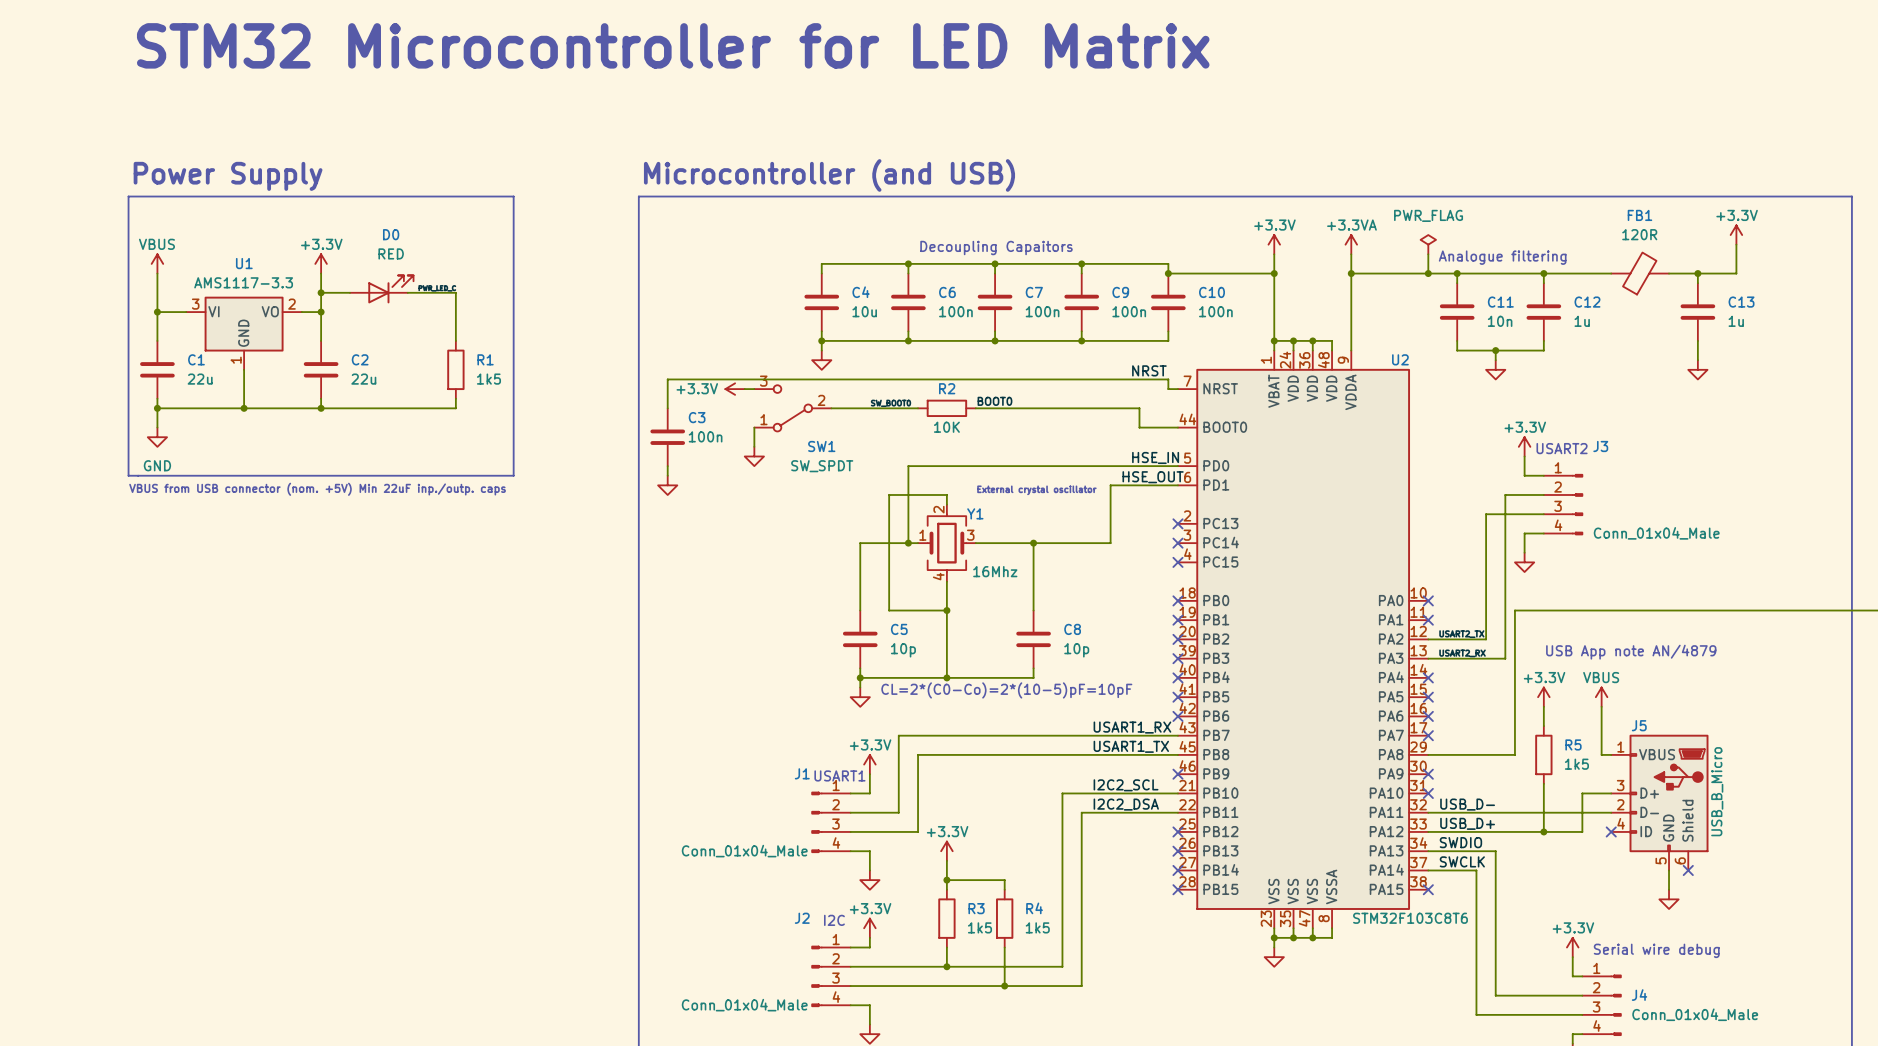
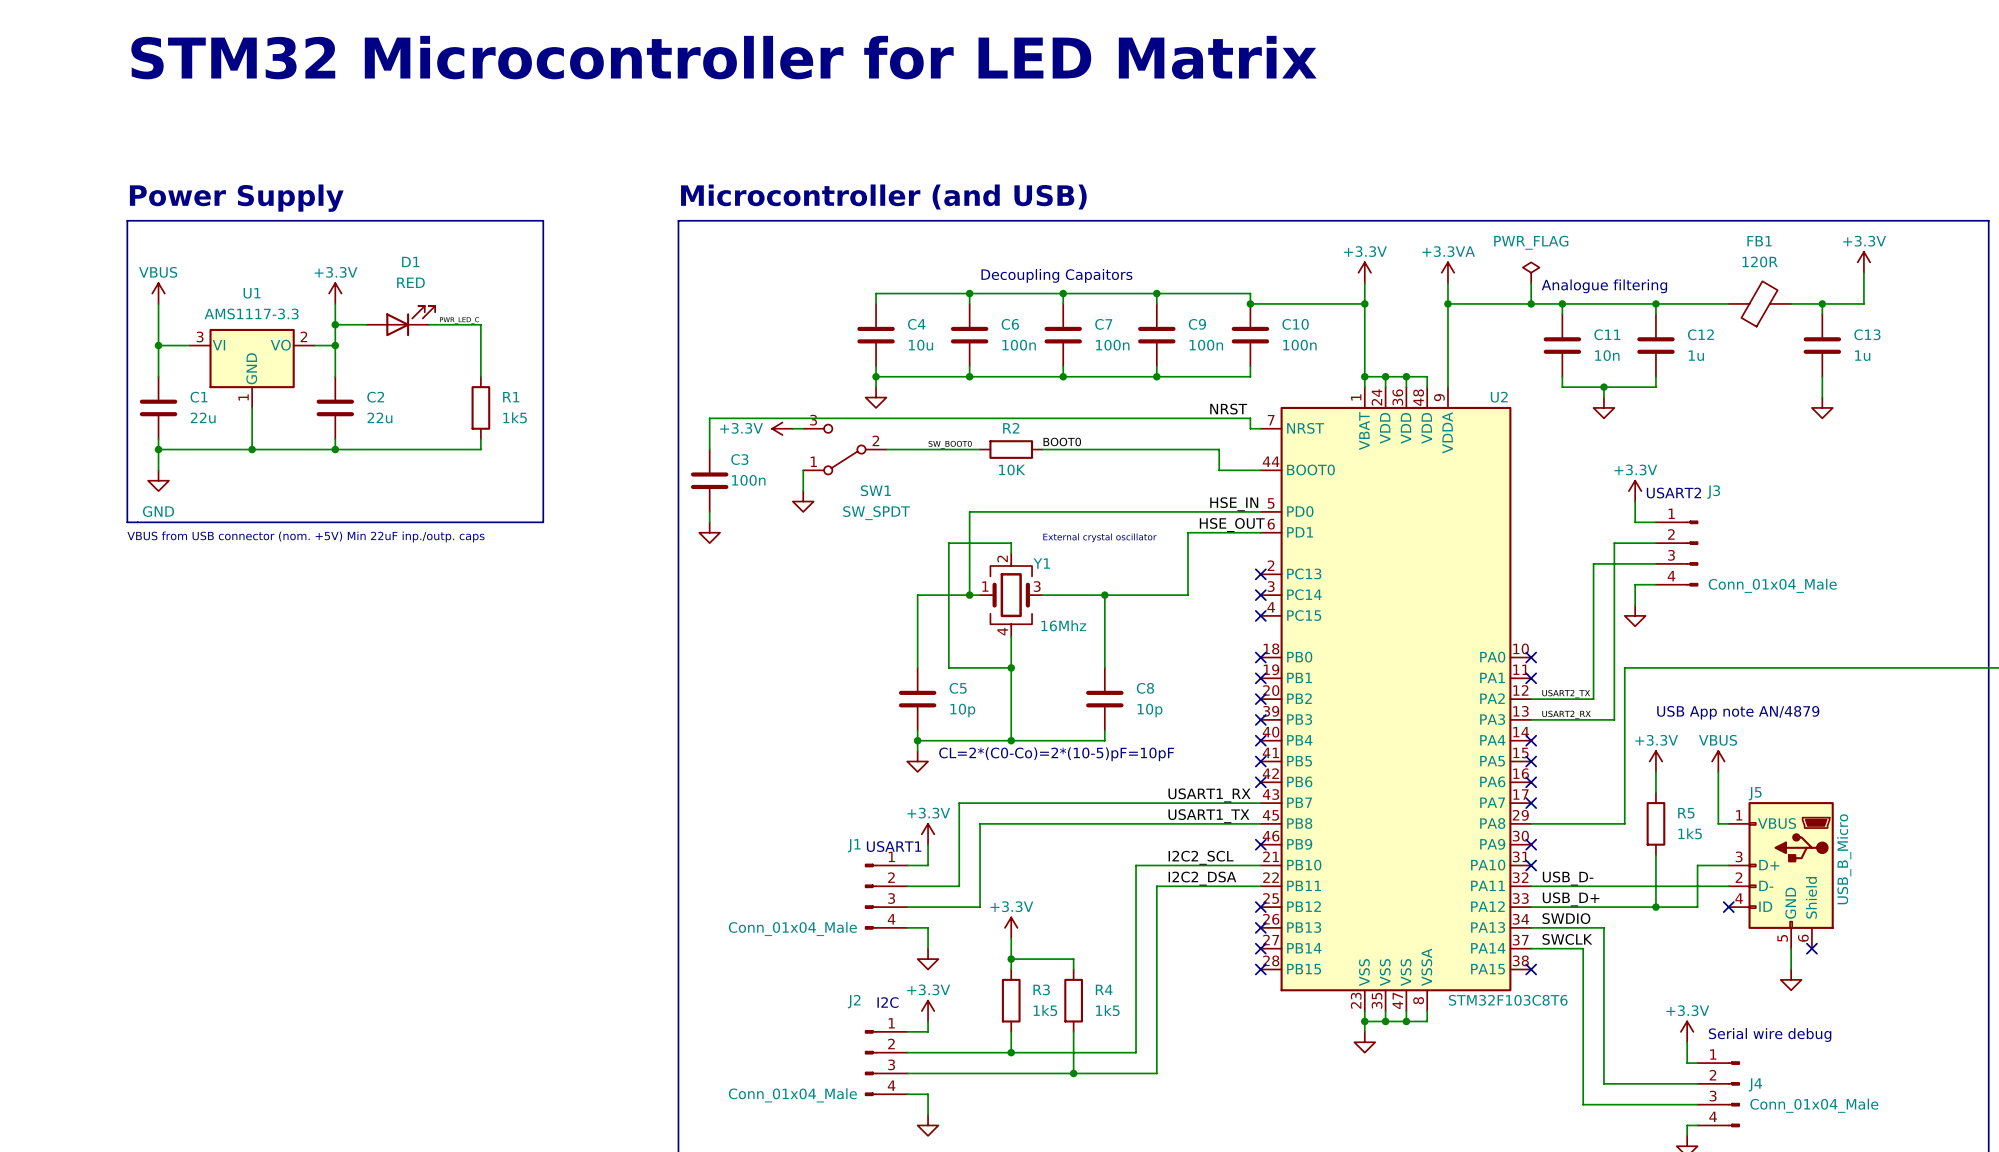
D0 name: D0 (391, 234) -> D1 (410, 261)

